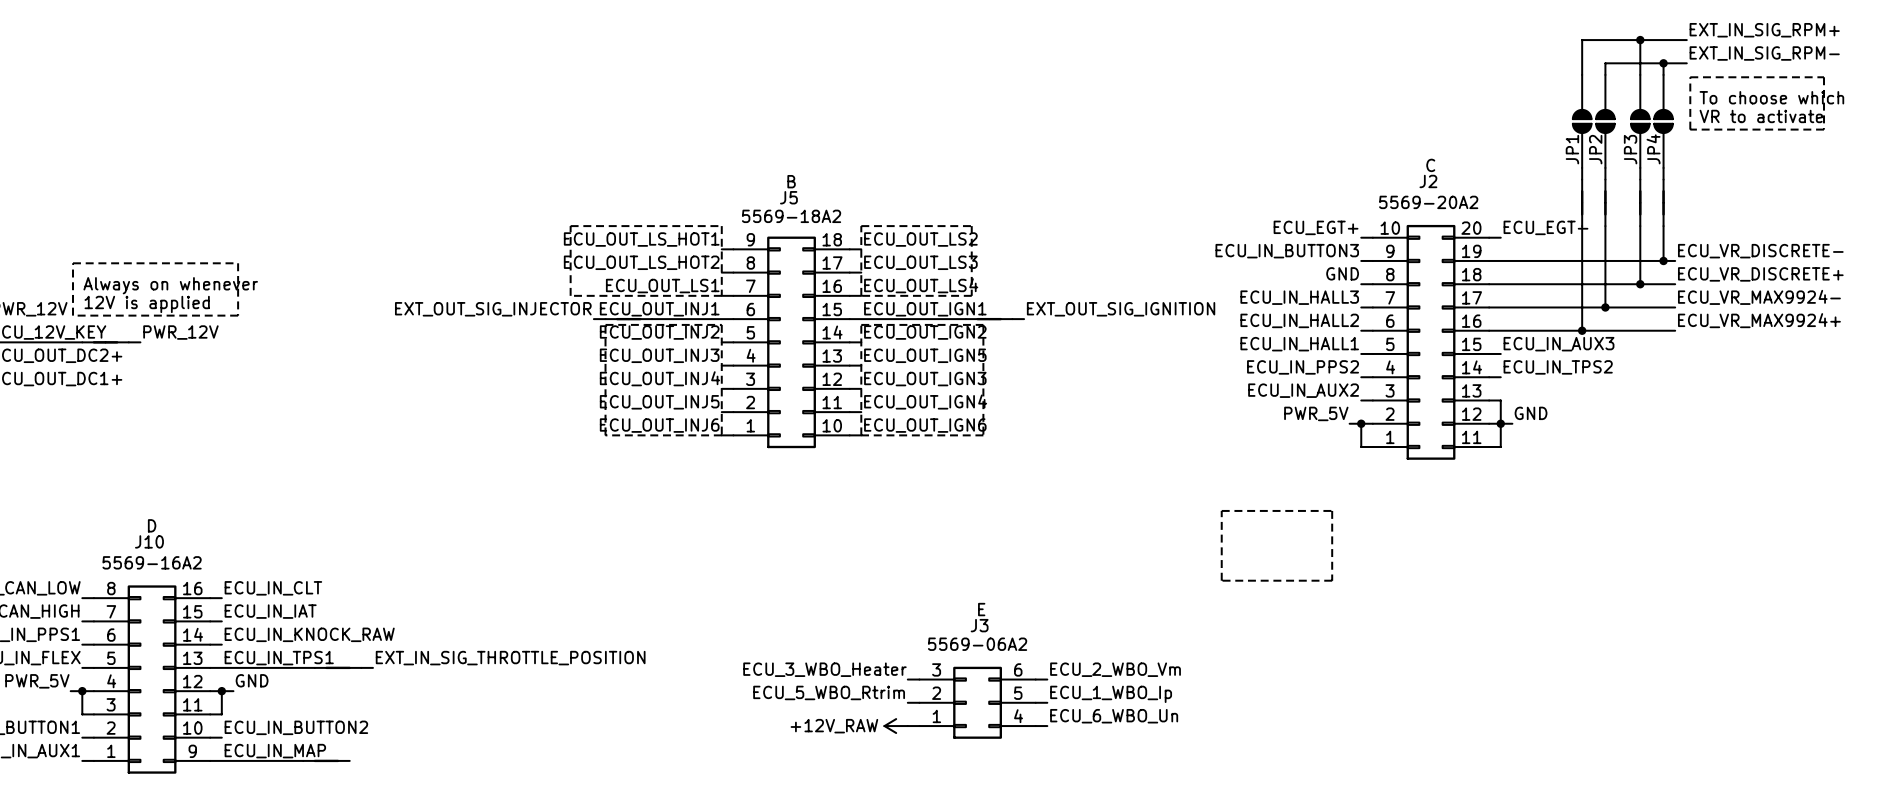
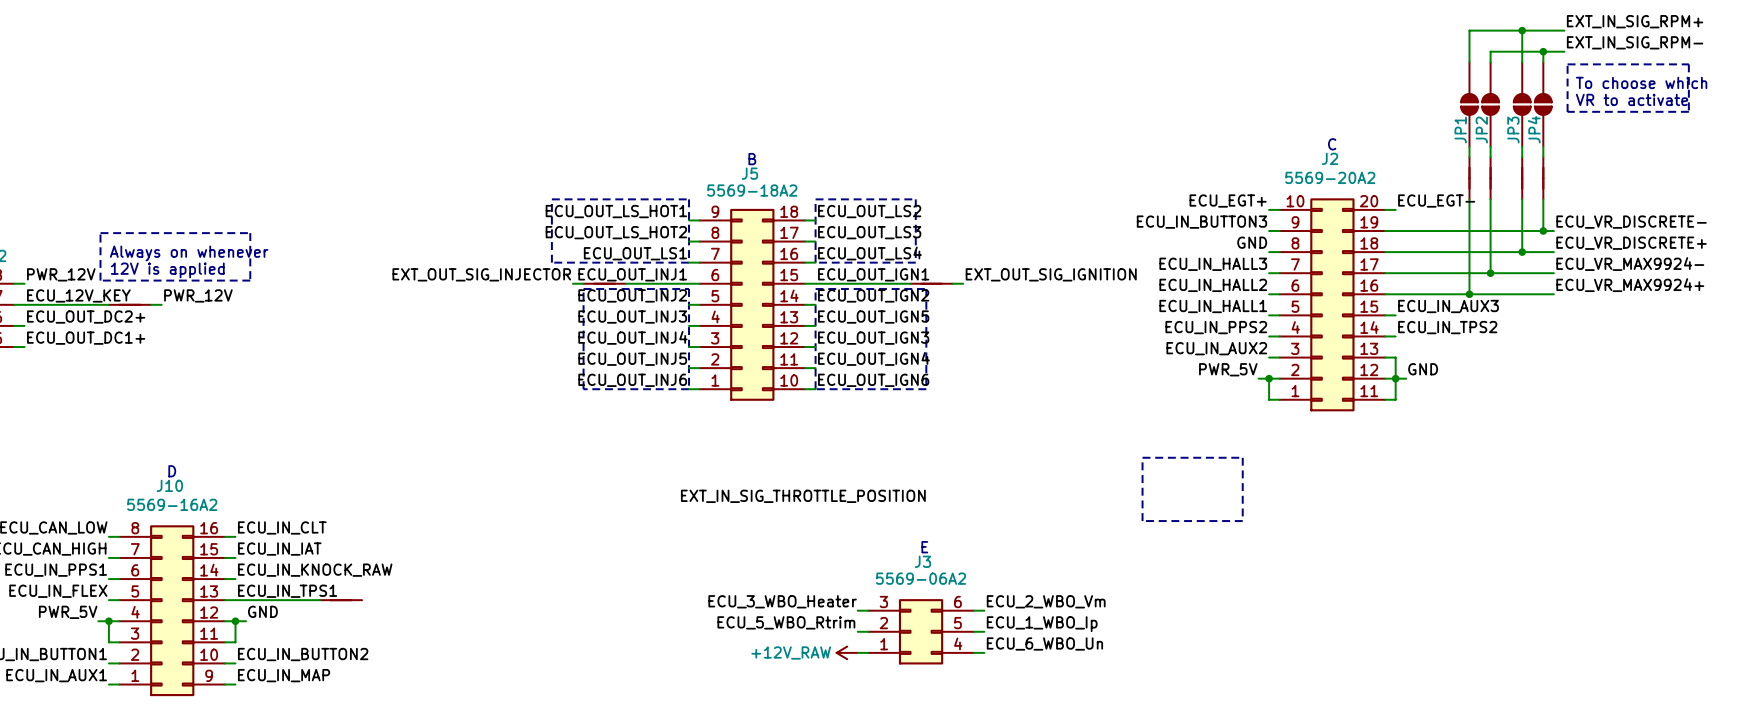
label: none -> EXT_IN_SIG_THROTTLE_POSITION (803, 496)
label: EXT_IN_SIG_THROTTLE_POSITION (510, 658) -> none
wire: (361, 667) (372, 667) -> none
wire: (221, 760) (303, 760) -> none
part: (326, 760) -> none

